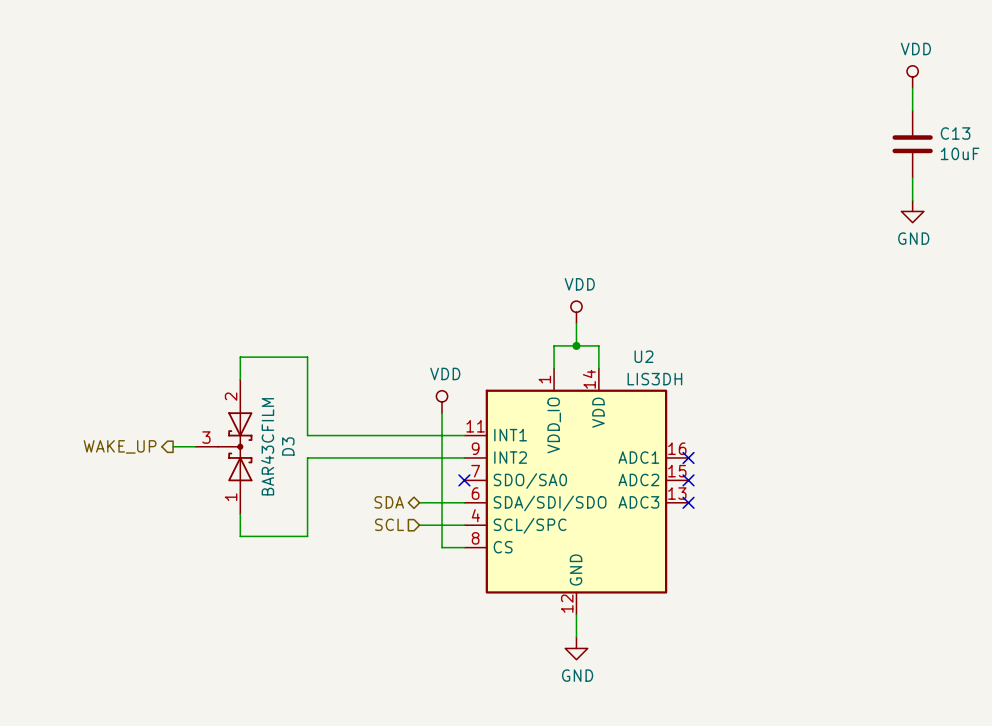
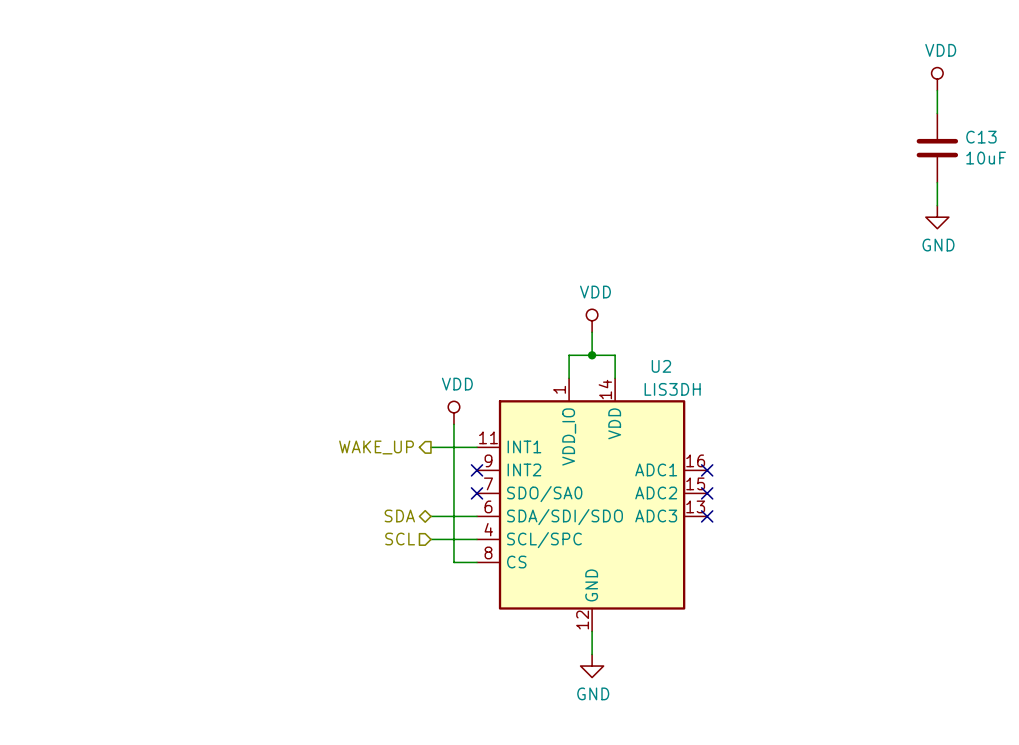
wire: (240, 379) (240, 357) (307, 357) (307, 435) (419, 435) -> none
hierarchical label: none -> WAKE_UP (376, 447)
hierarchical label: WAKE_UP (120, 446) -> none
wire: (173, 446) (195, 446) -> none
D3: BAR43CFILM (223, 446) -> none
wire: (464, 457) (307, 457) (307, 536) (240, 536) (240, 514) -> none
no-connect mark: none -> (477, 470)

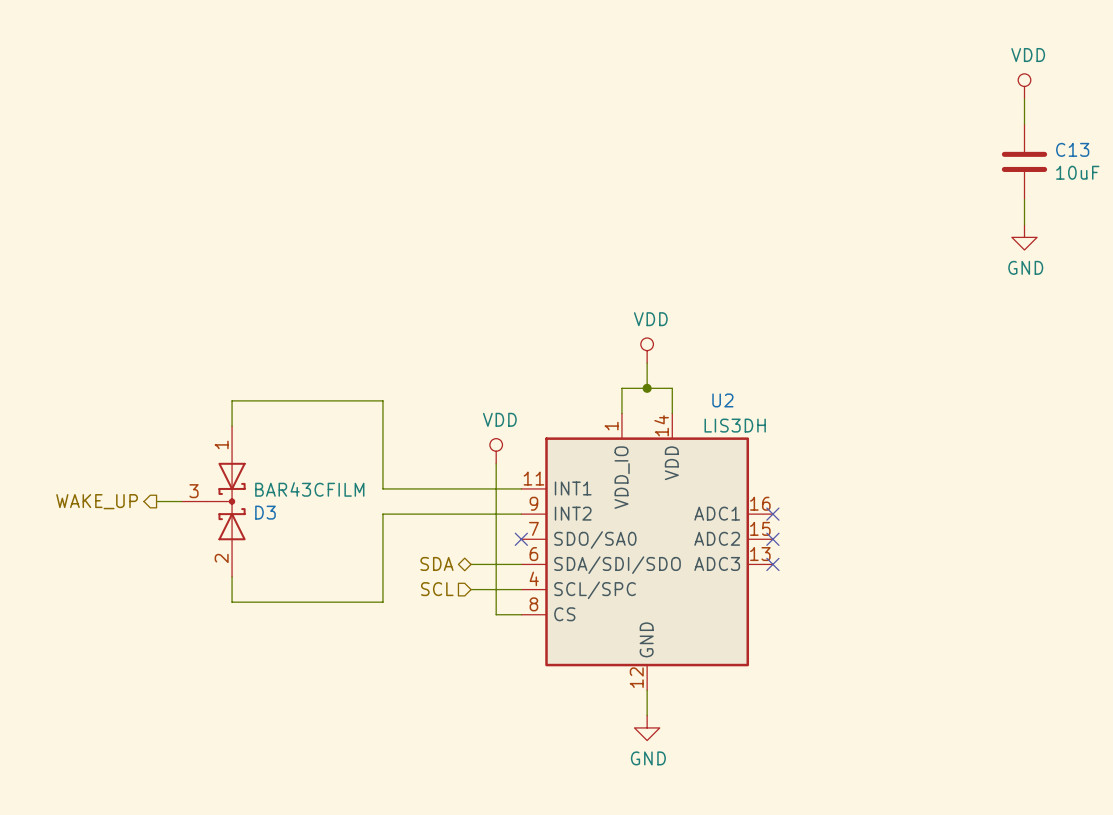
wire: none -> (232, 426) (232, 400) (382, 400) (382, 488) (471, 488)
hierarchical label: WAKE_UP (376, 447) -> none
hierarchical label: none -> WAKE_UP (97, 501)
wire: none -> (156, 501) (181, 501)
D3: none -> BAR43CFILM (213, 501)
wire: none -> (521, 514) (382, 514) (382, 602) (232, 602) (232, 577)
no-connect mark: (477, 470) -> none

